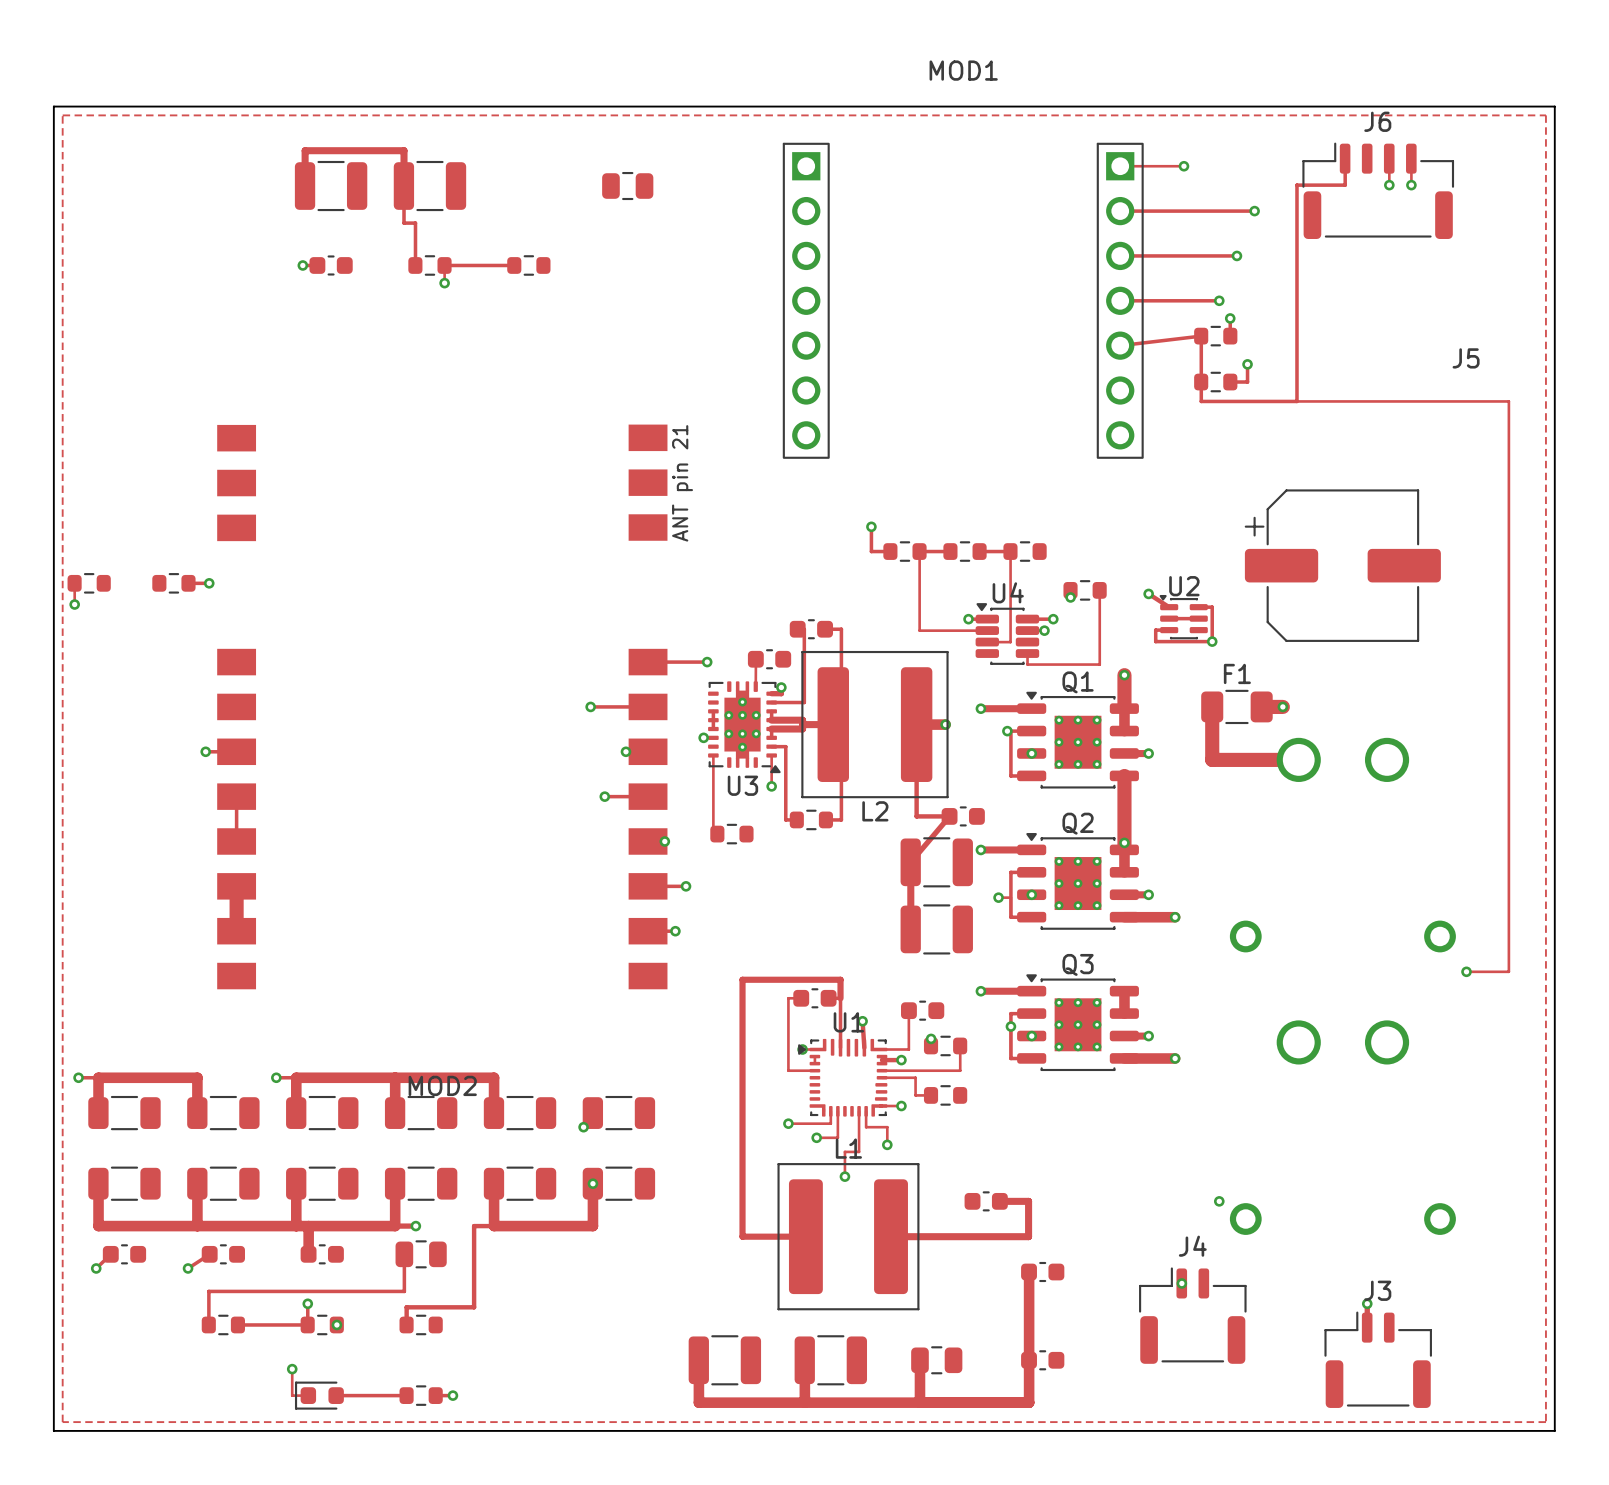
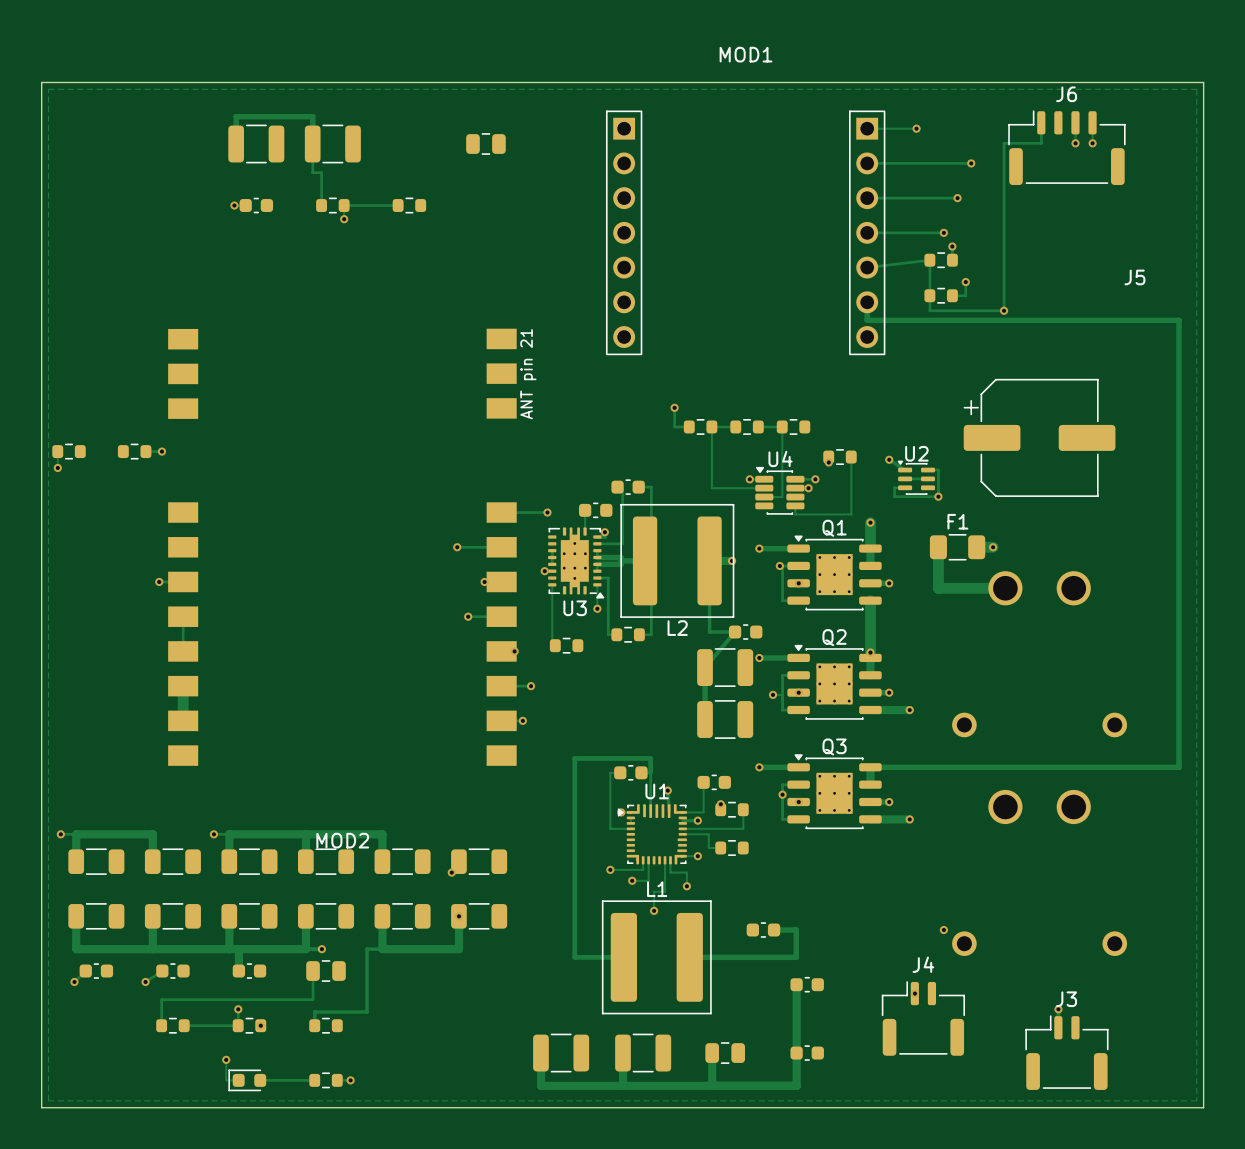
track: none -> (867, 302) (867, 320) (1179, 320) (1179, 767) (870, 767)
track: (1296, 401) (1508, 401) (1508, 971) (1466, 971) -> none
via: none -> (1004, 310)
via: (1466, 971) -> none

